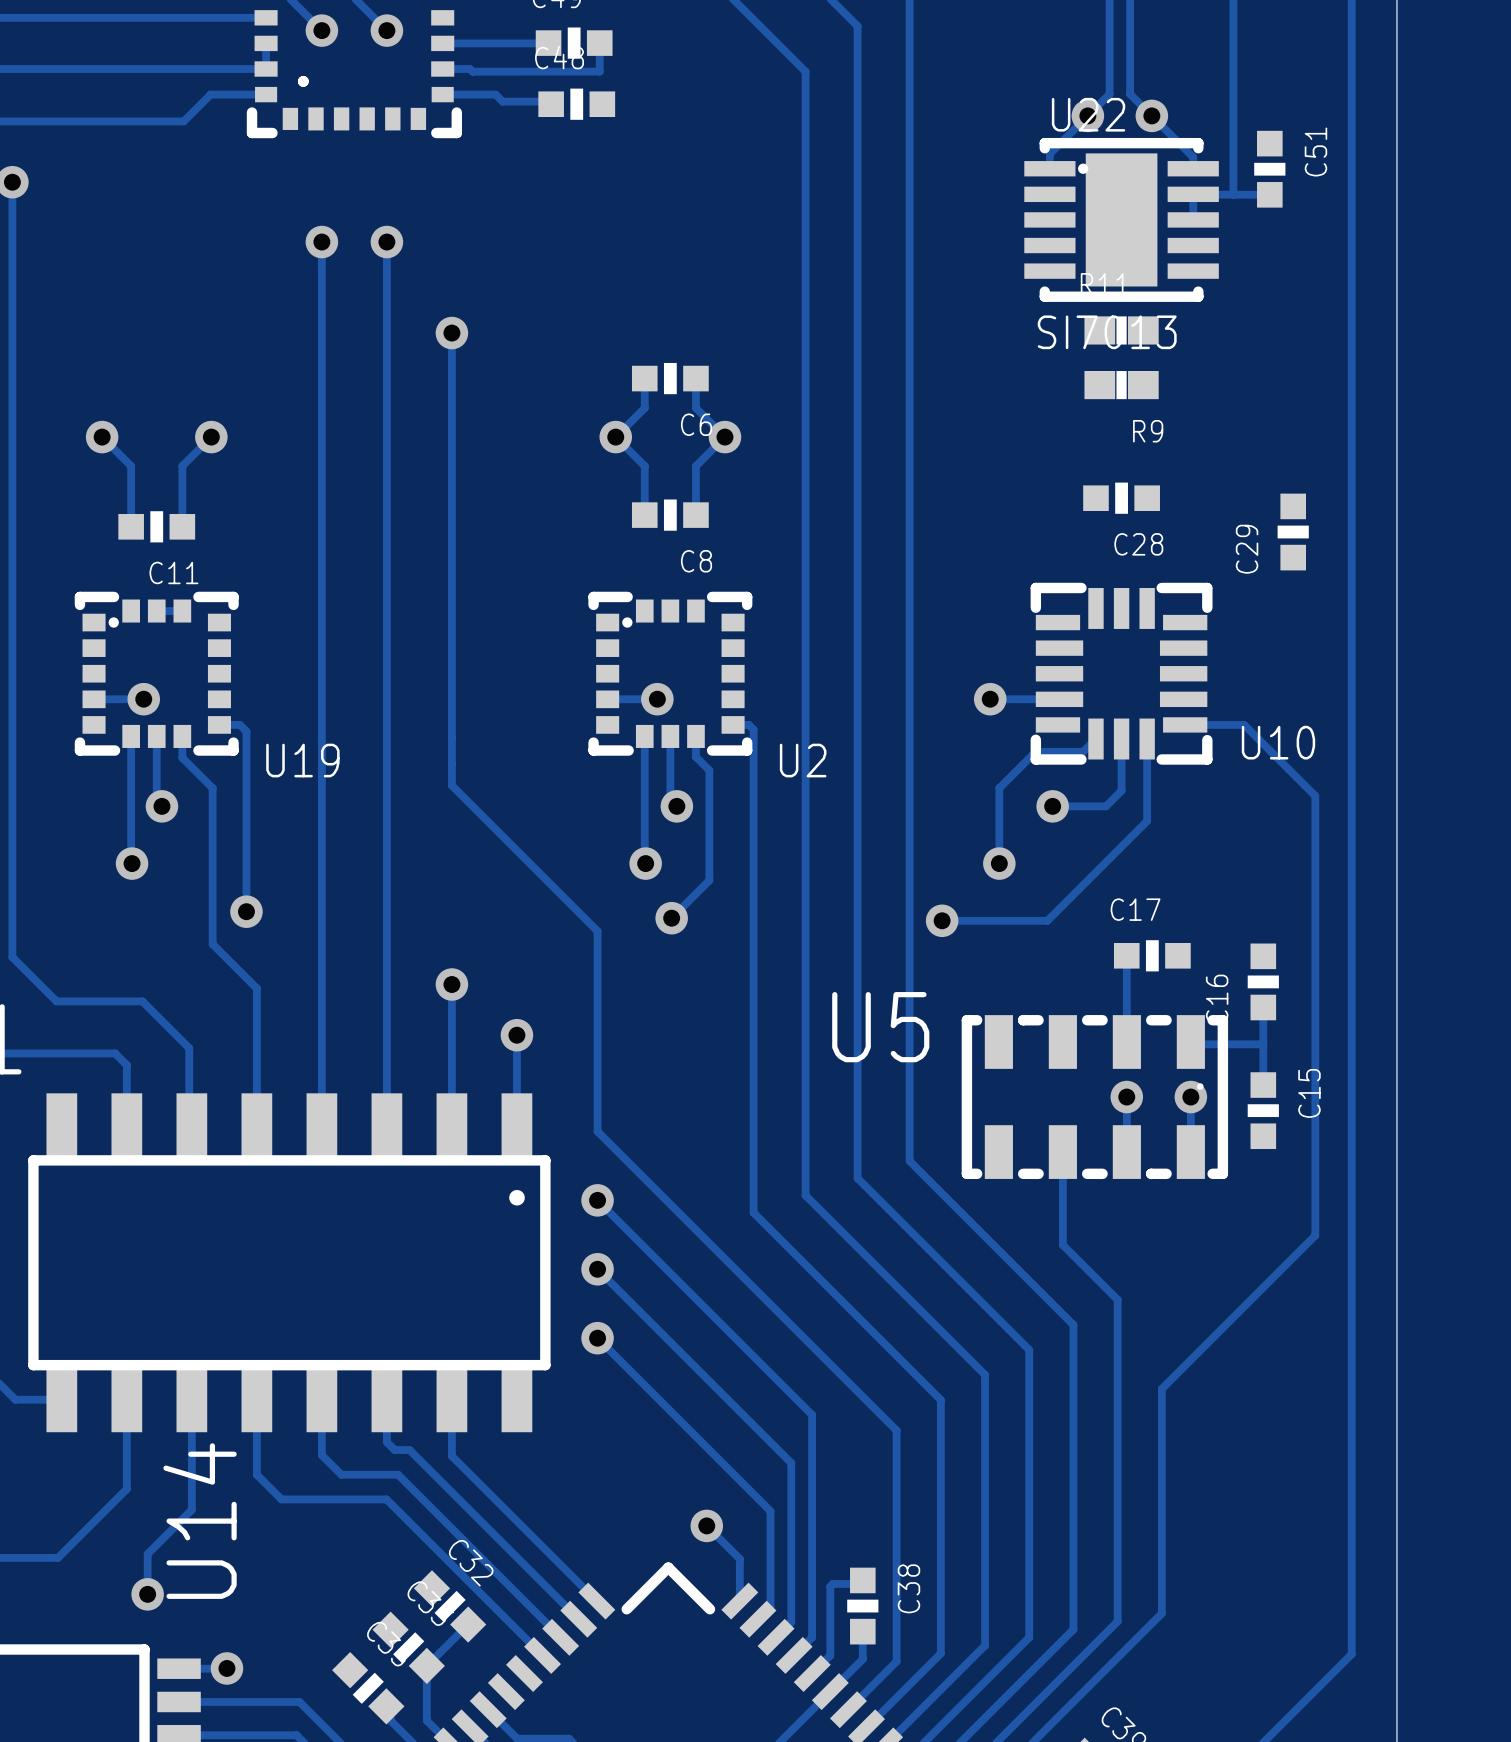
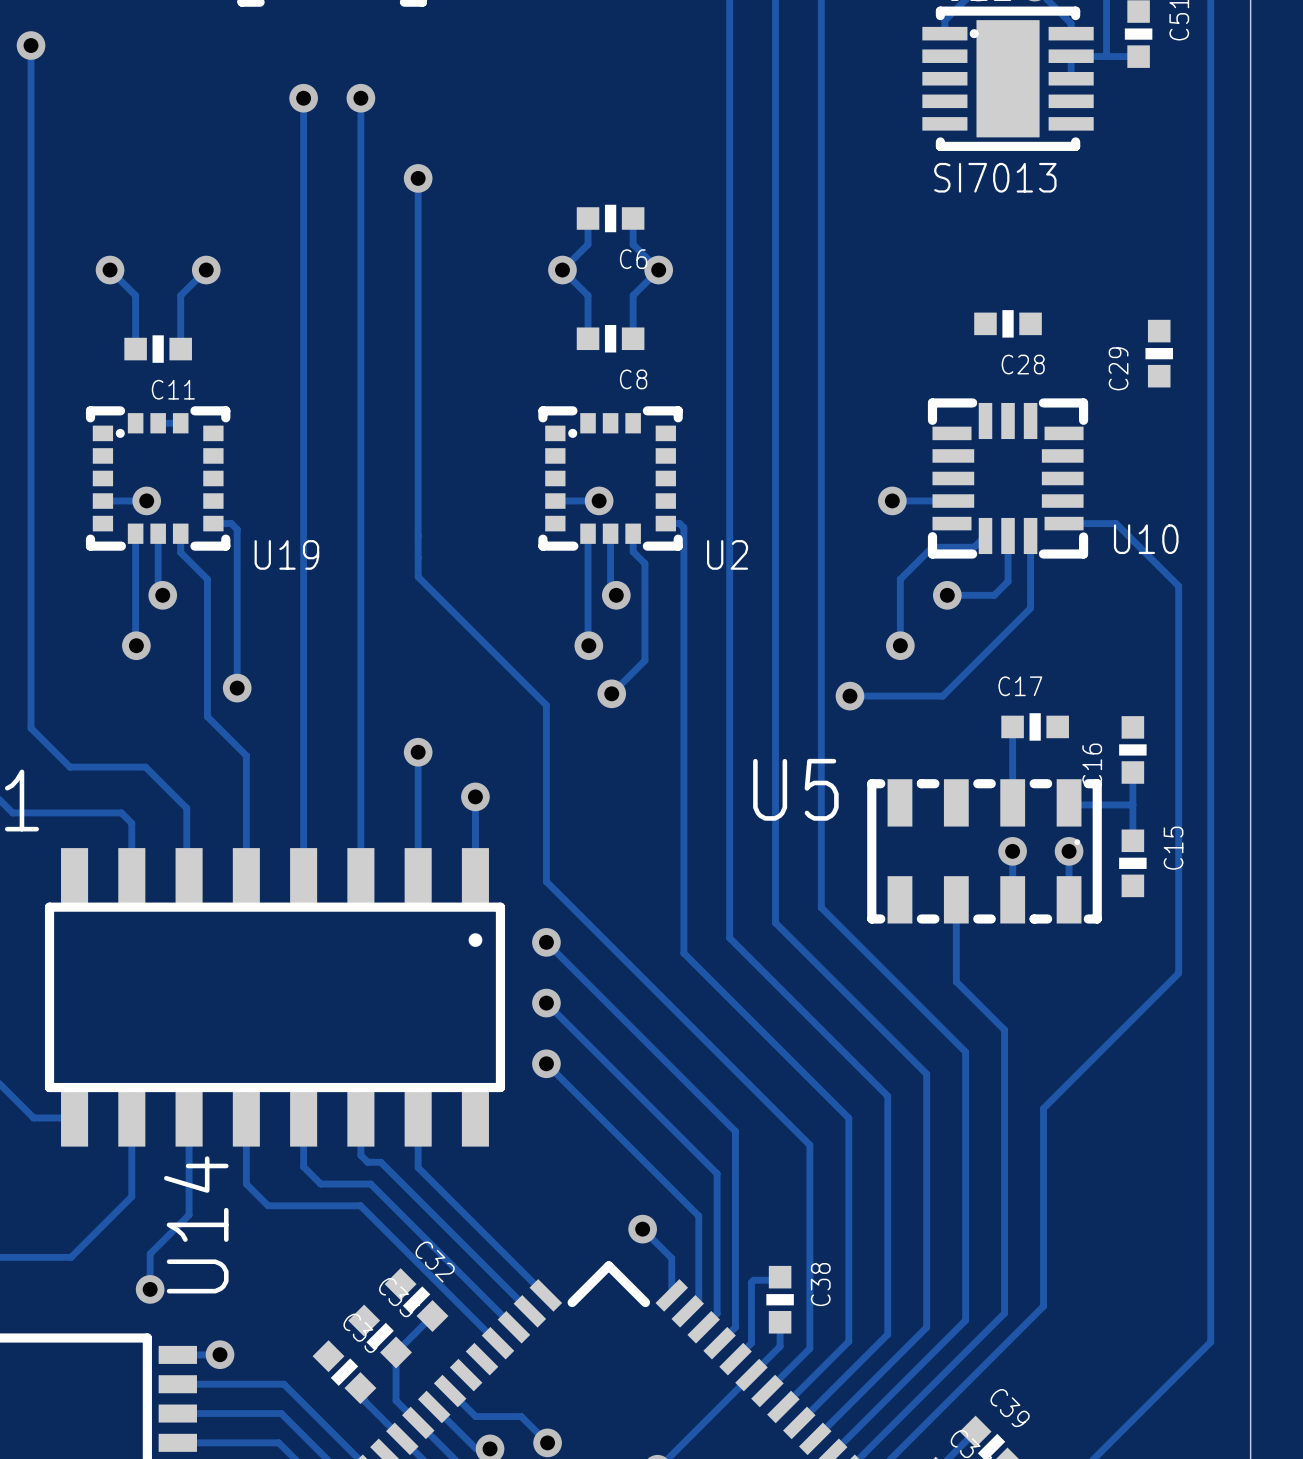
part: (1121, 330) -> none
R9: (1121, 385) -> none

